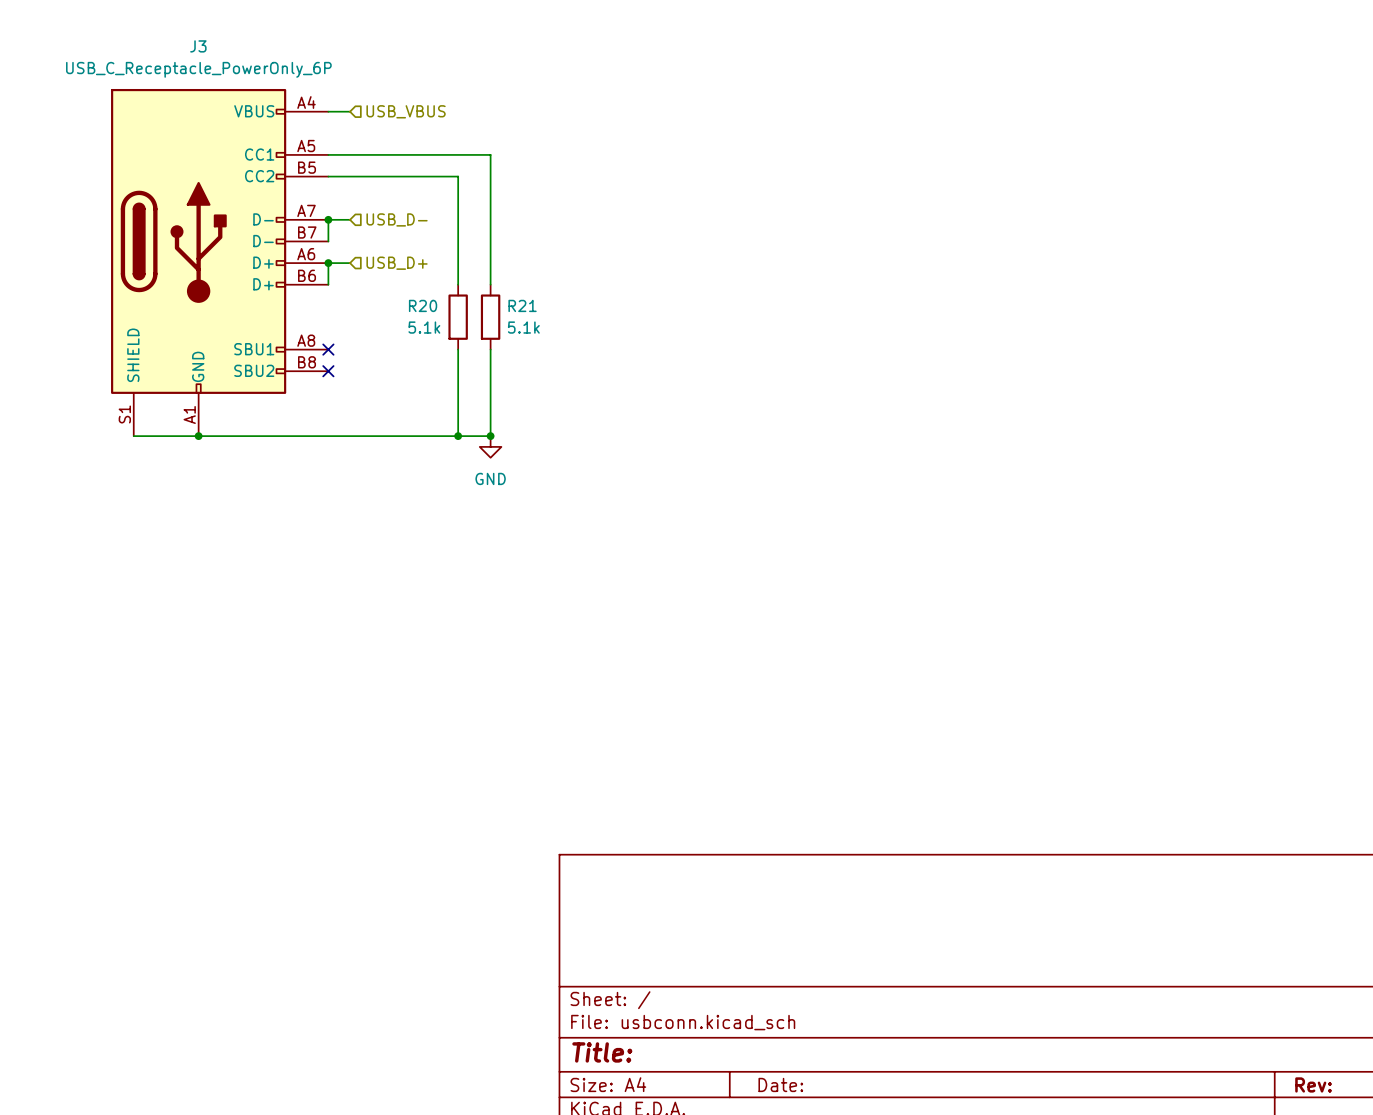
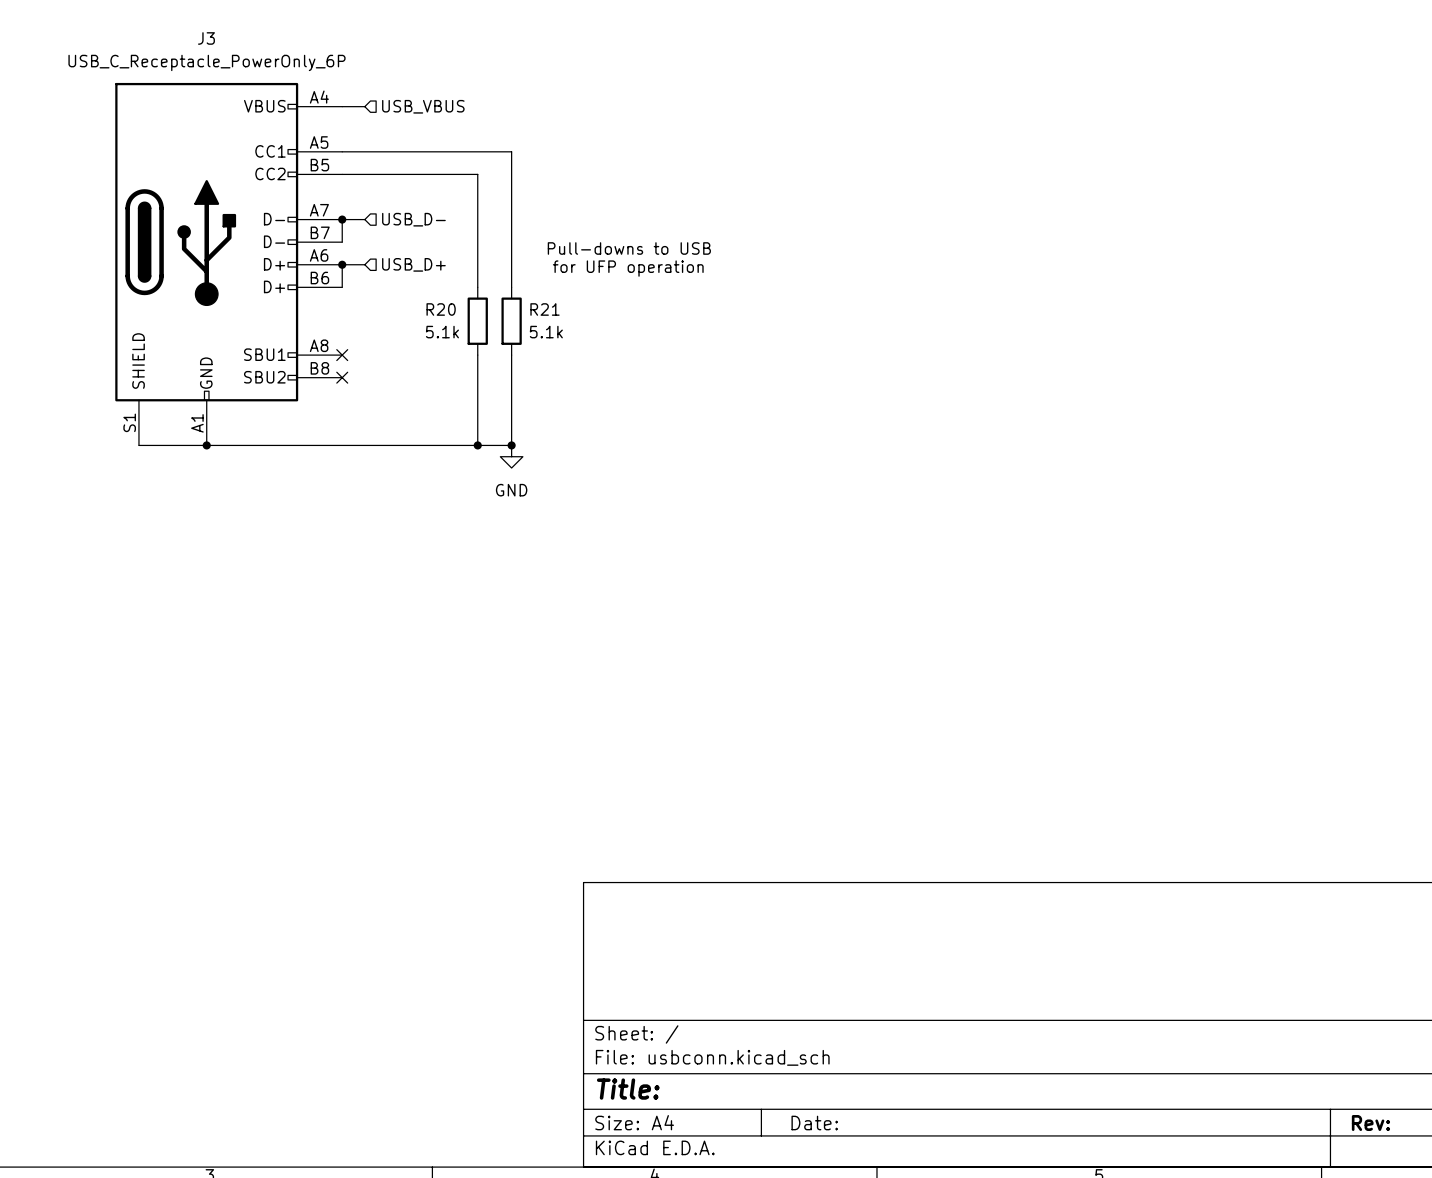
text: none -> Pull-downs to USB (629, 248)
text: none -> for UFP operation (628, 268)

